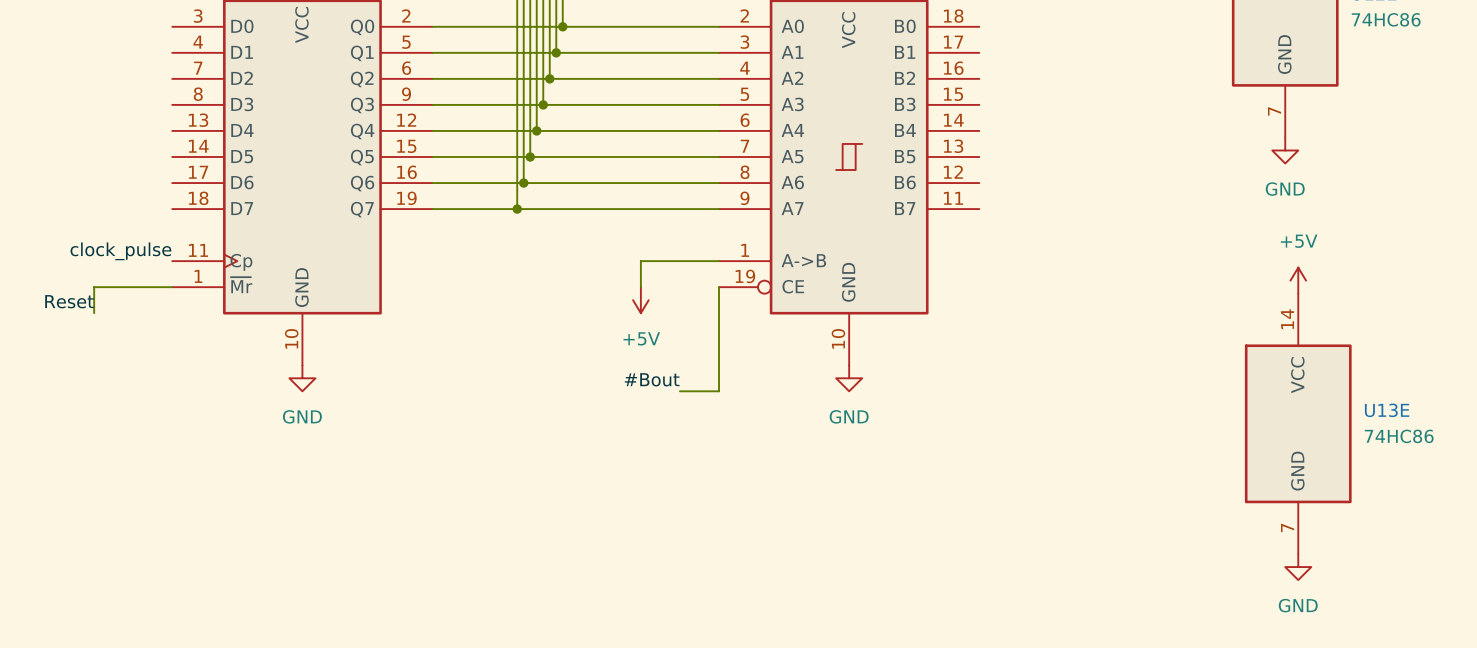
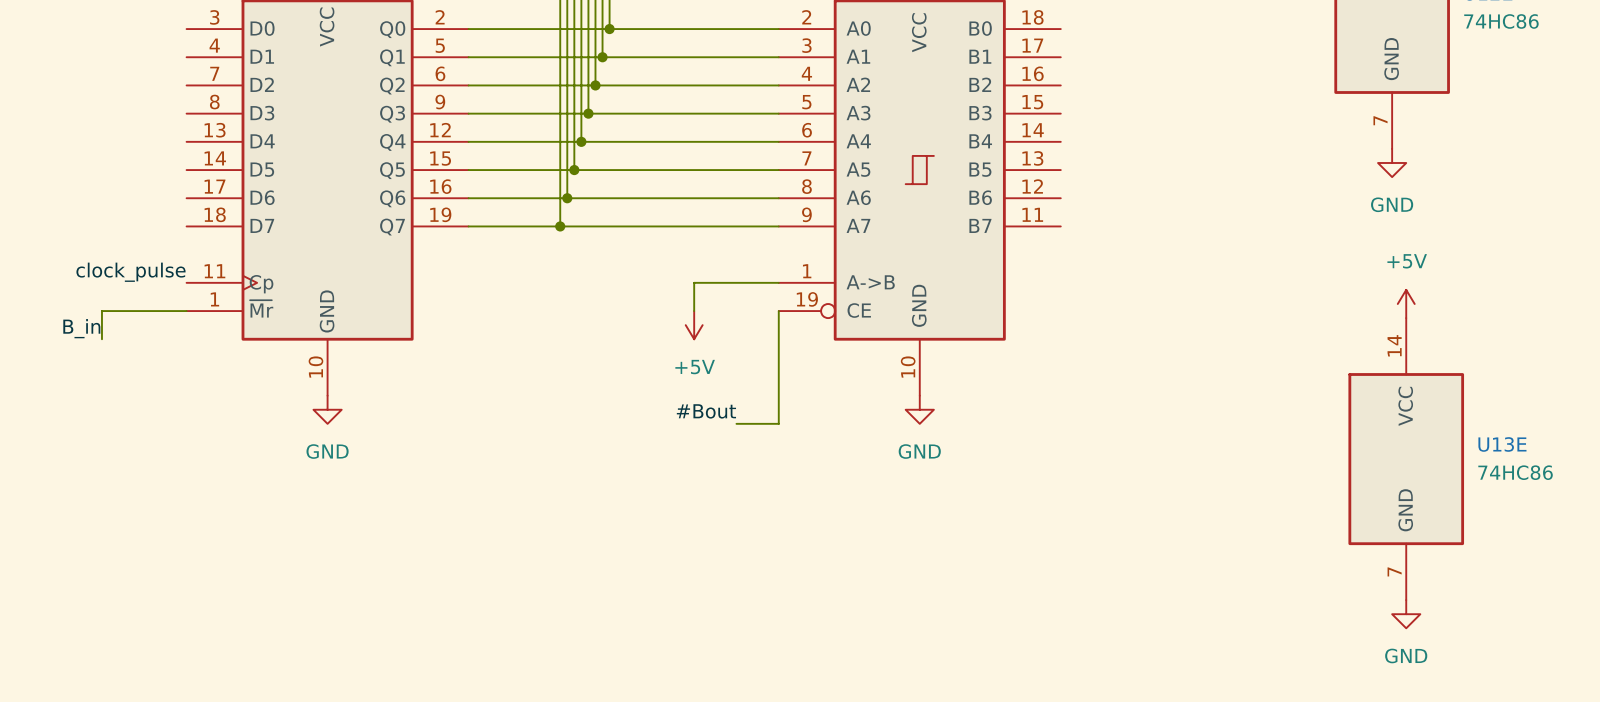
label: Reset (69, 301) -> B_in (81, 328)

